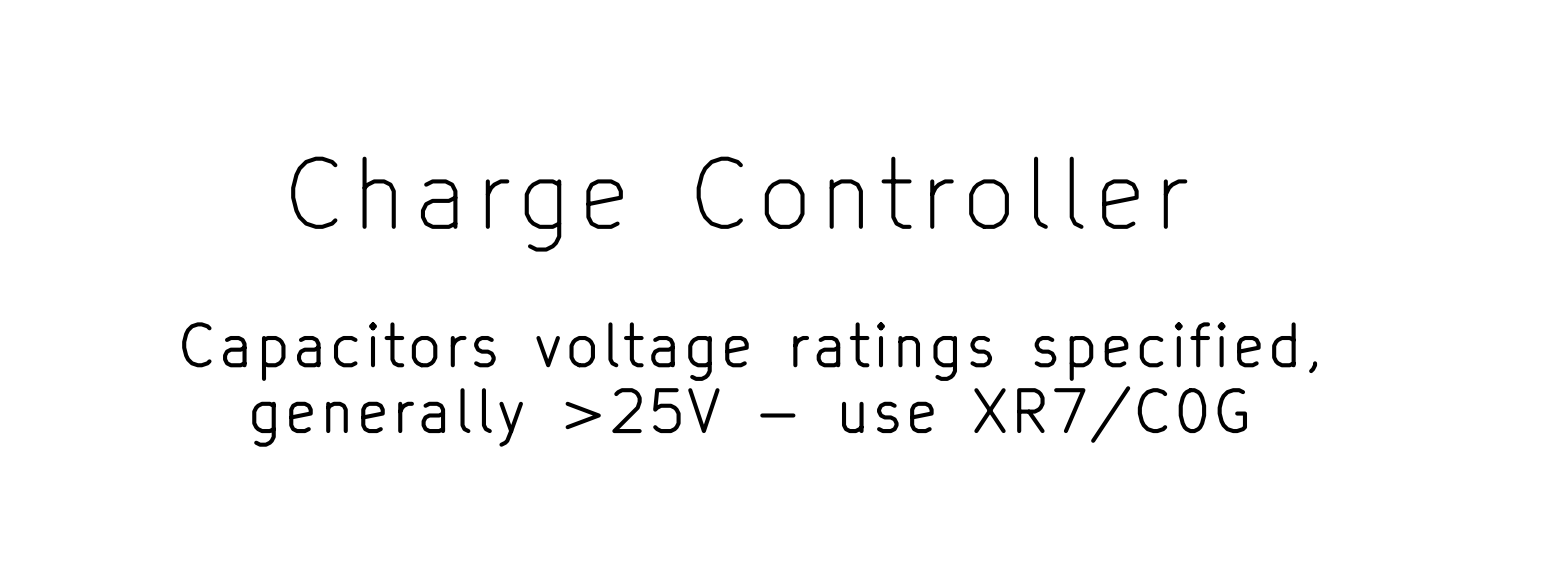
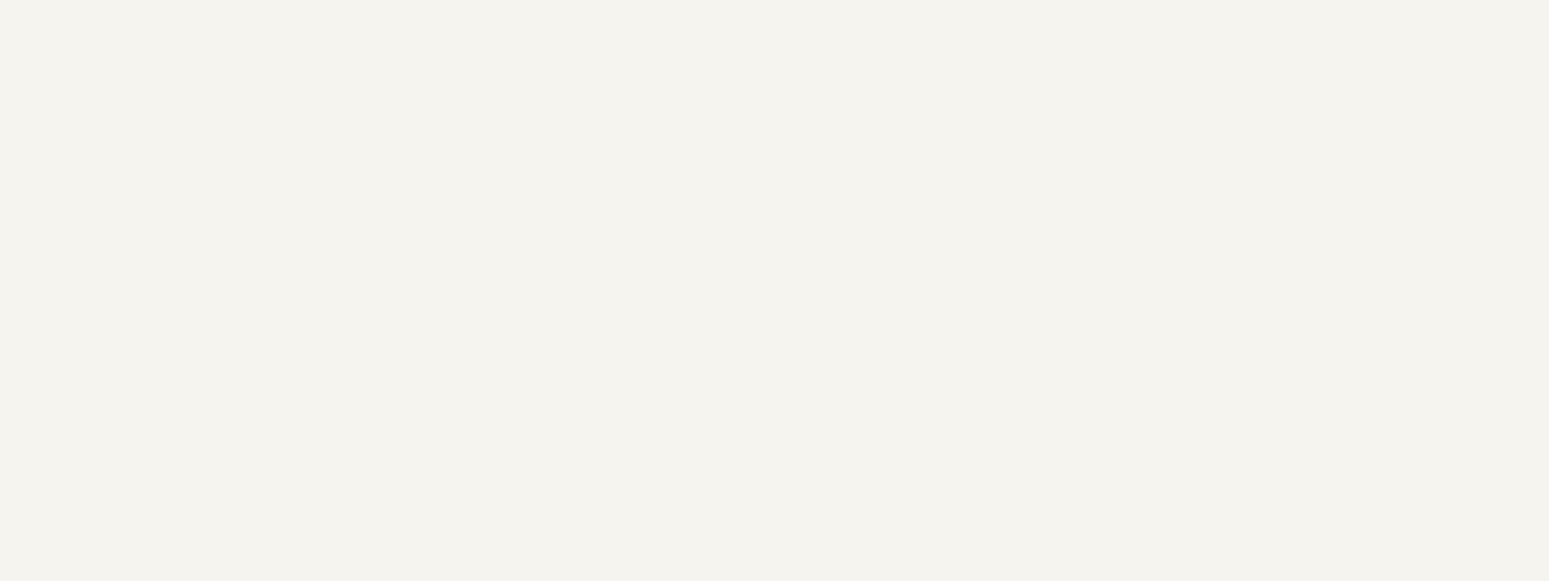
text: Charge Controller (739, 204) -> none
text: Capacitors voltage ratings specified, (749, 351) -> none
text: generally >25V - use XR7/C0G (749, 416) -> none

